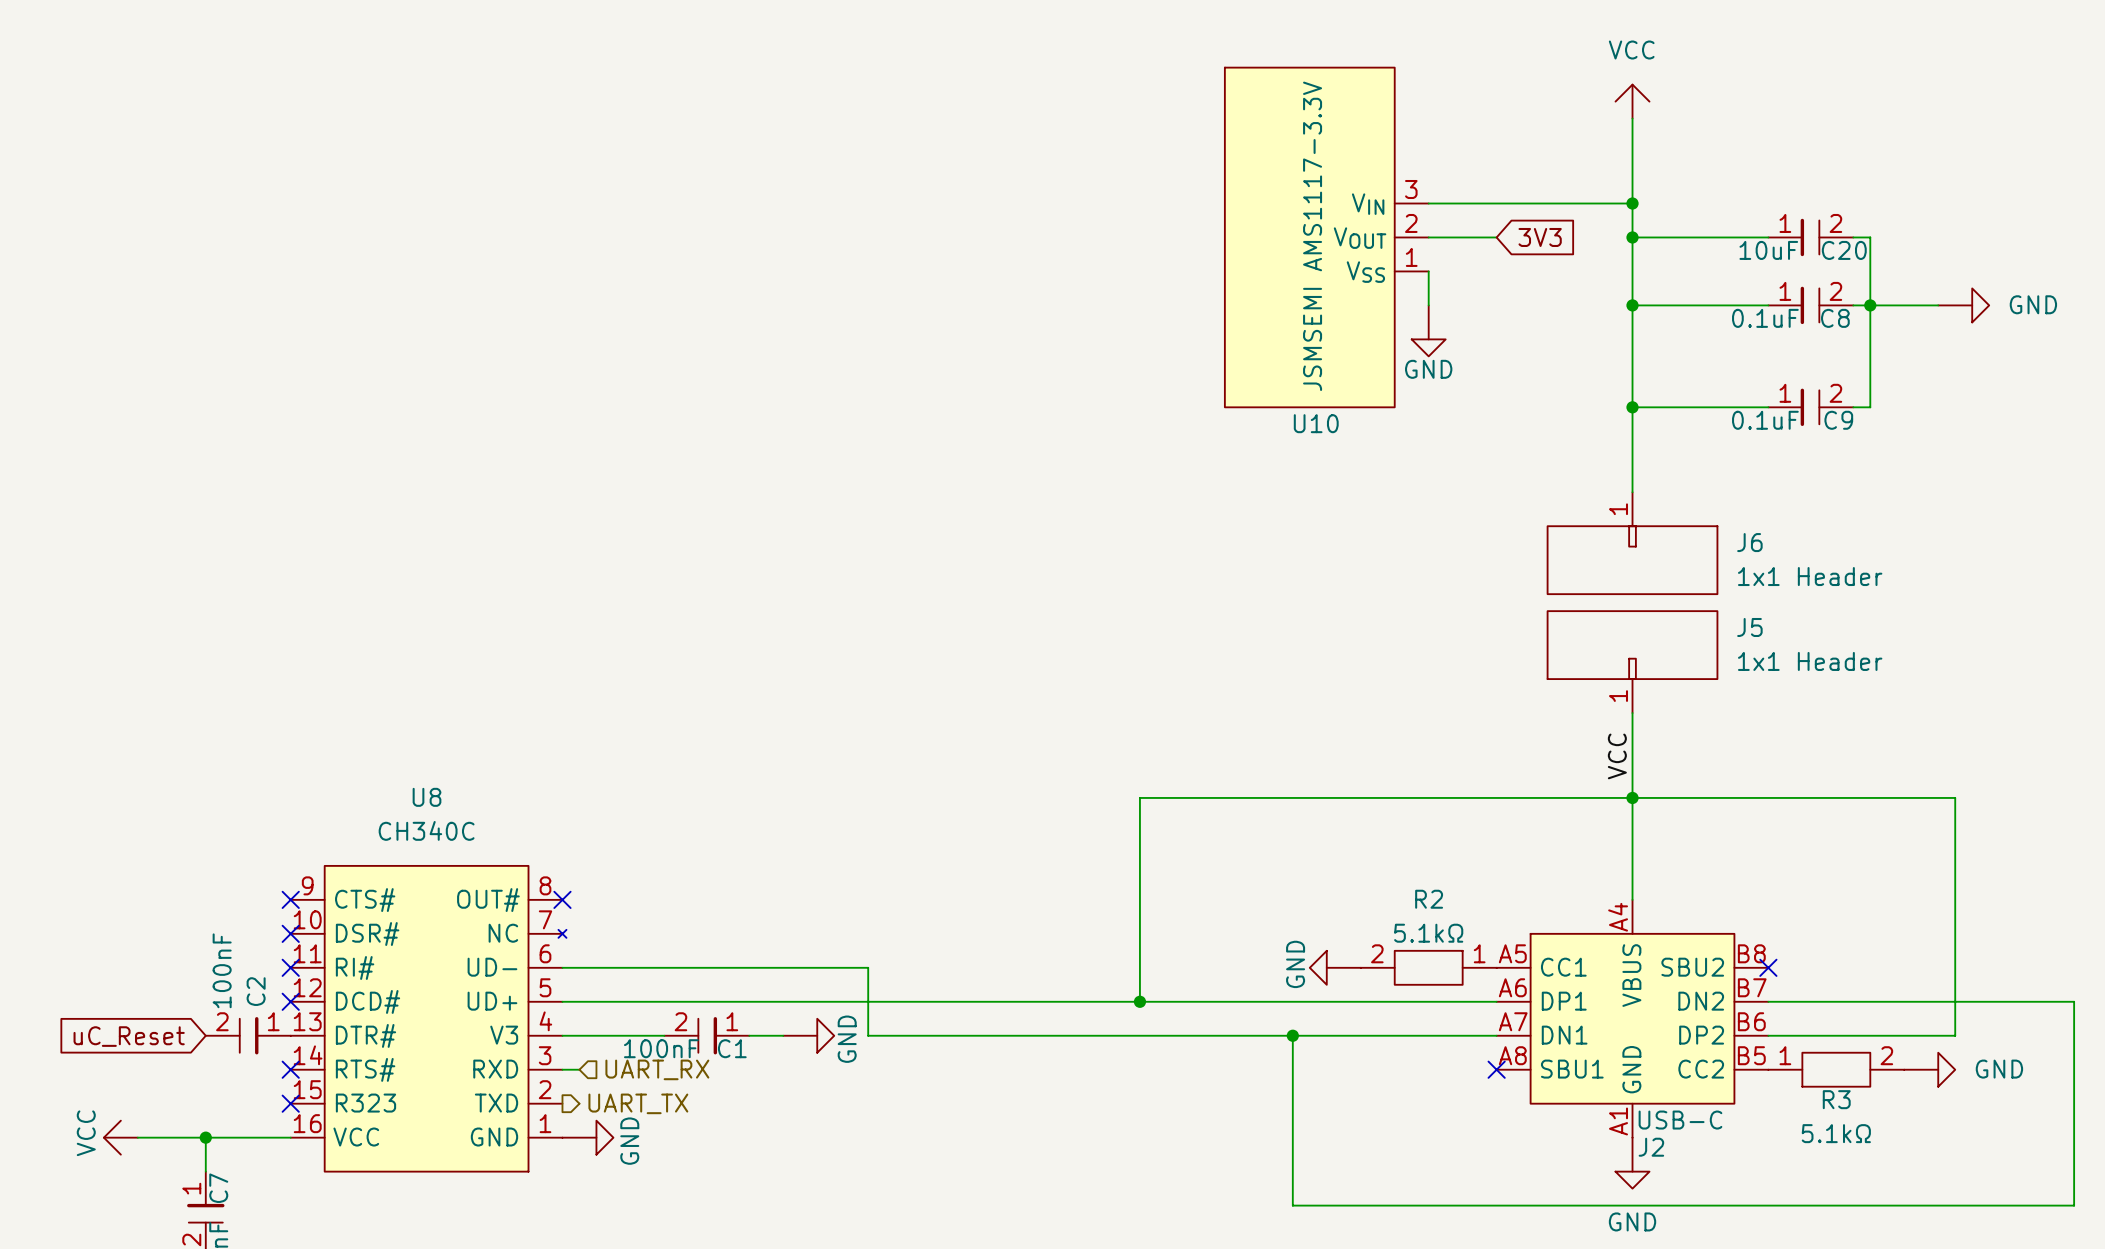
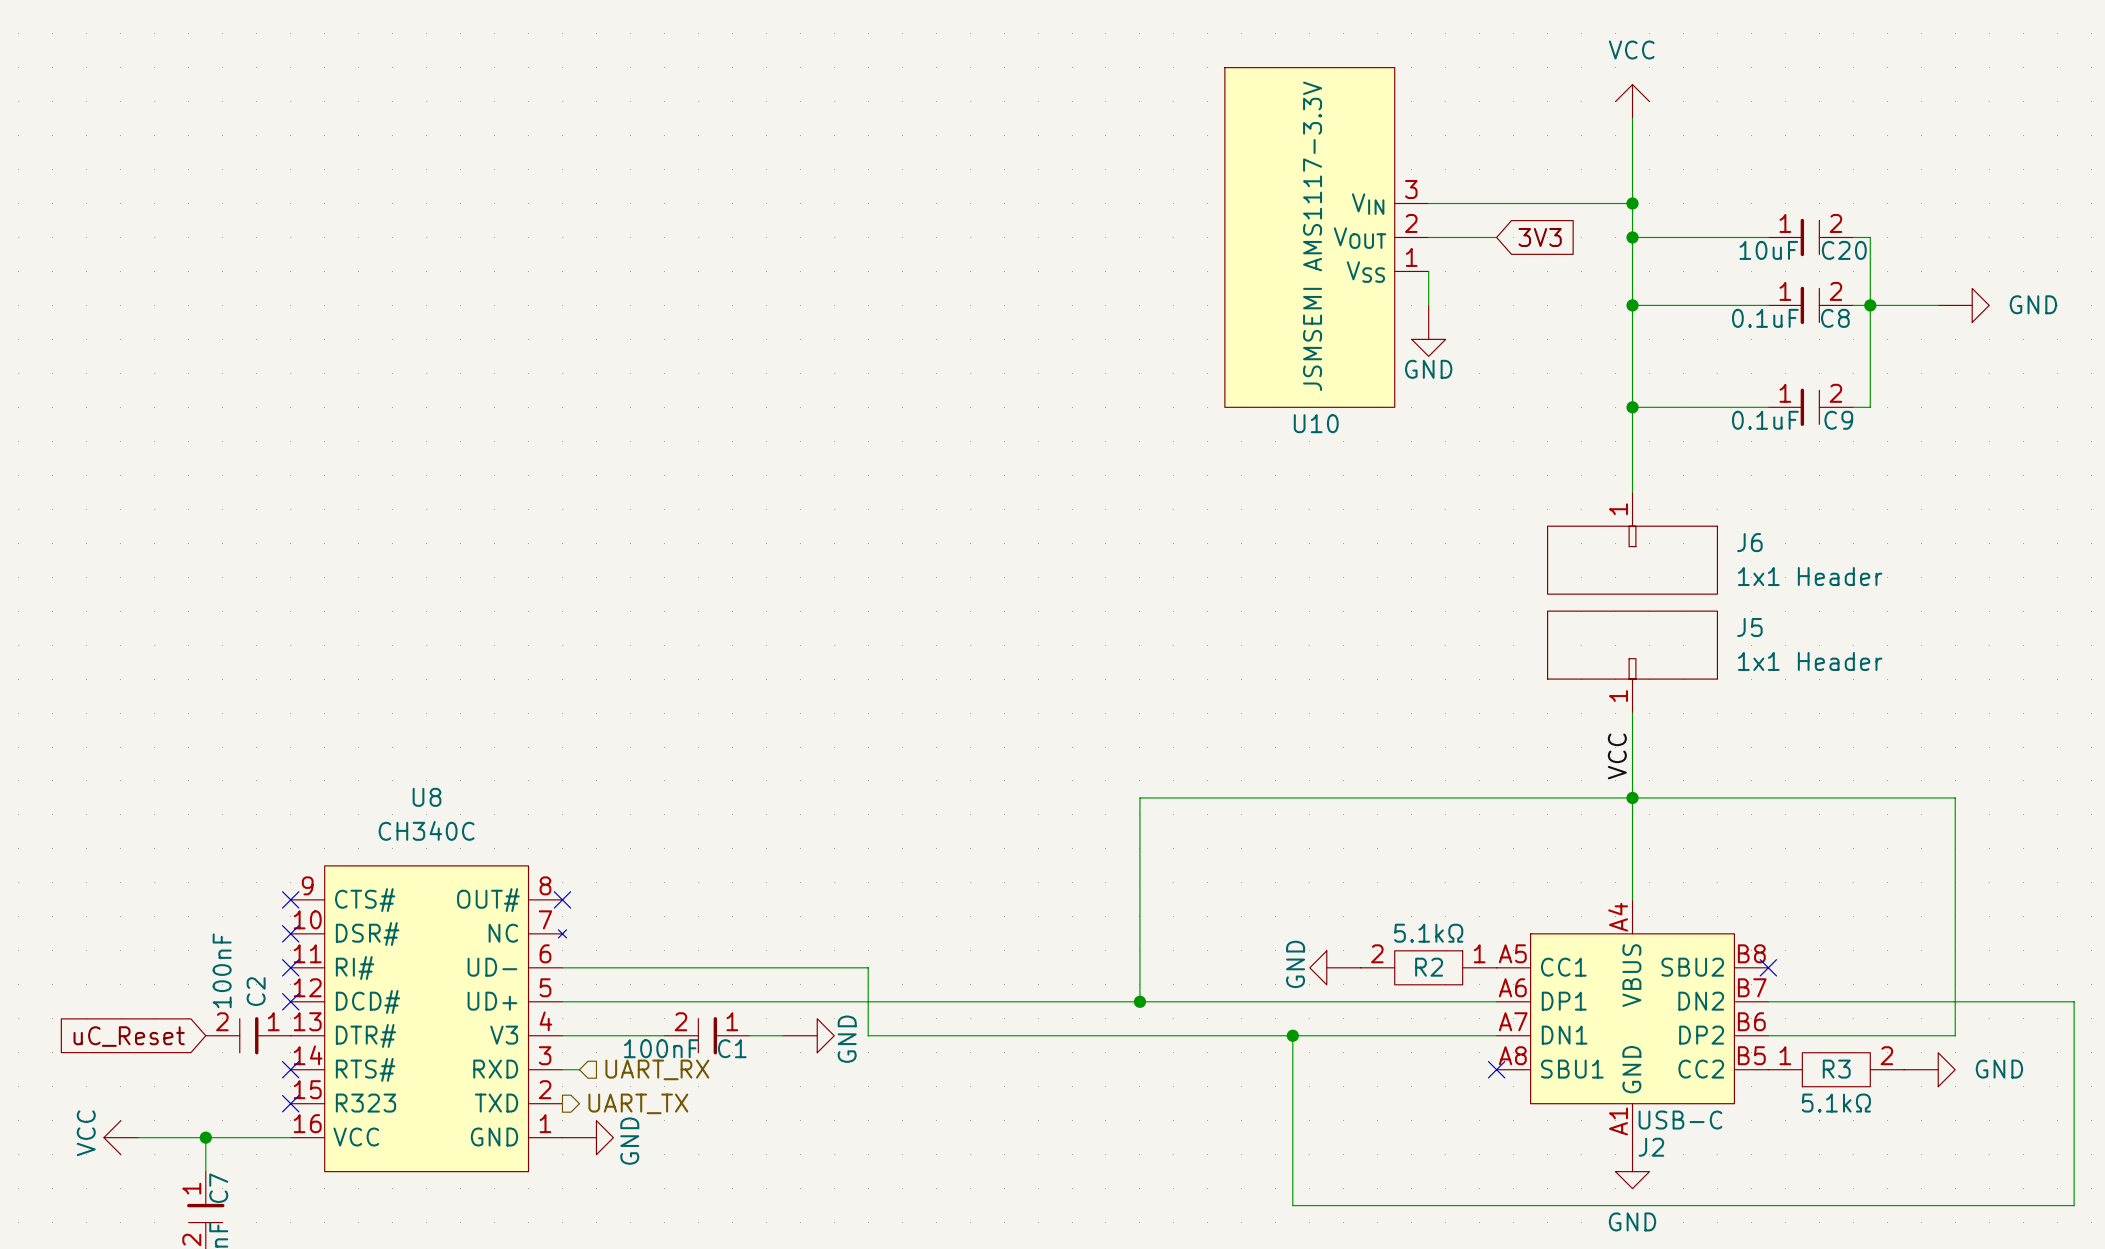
R2 name position: R2 (1429, 899) -> R2 (1429, 967)
R3 name position: R3 (1836, 1099) -> R3 (1836, 1069)
R3 value position: 5.1kΩ (1836, 1133) -> 5.1kΩ (1836, 1103)

